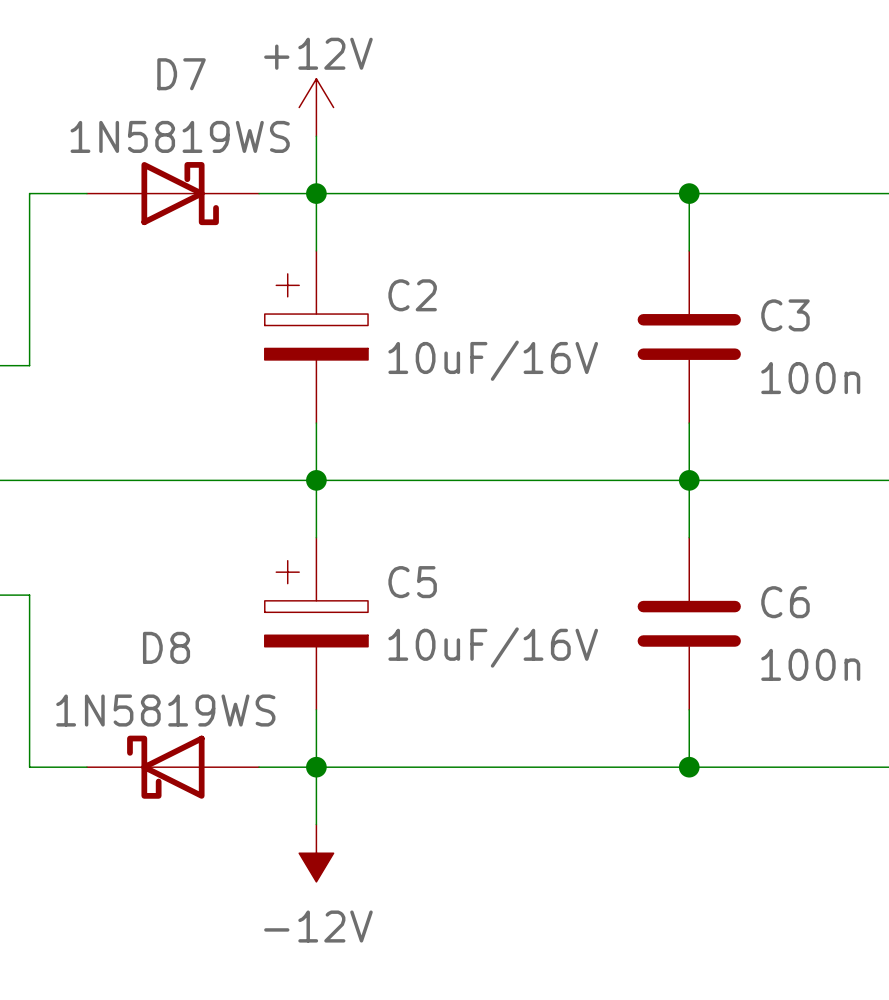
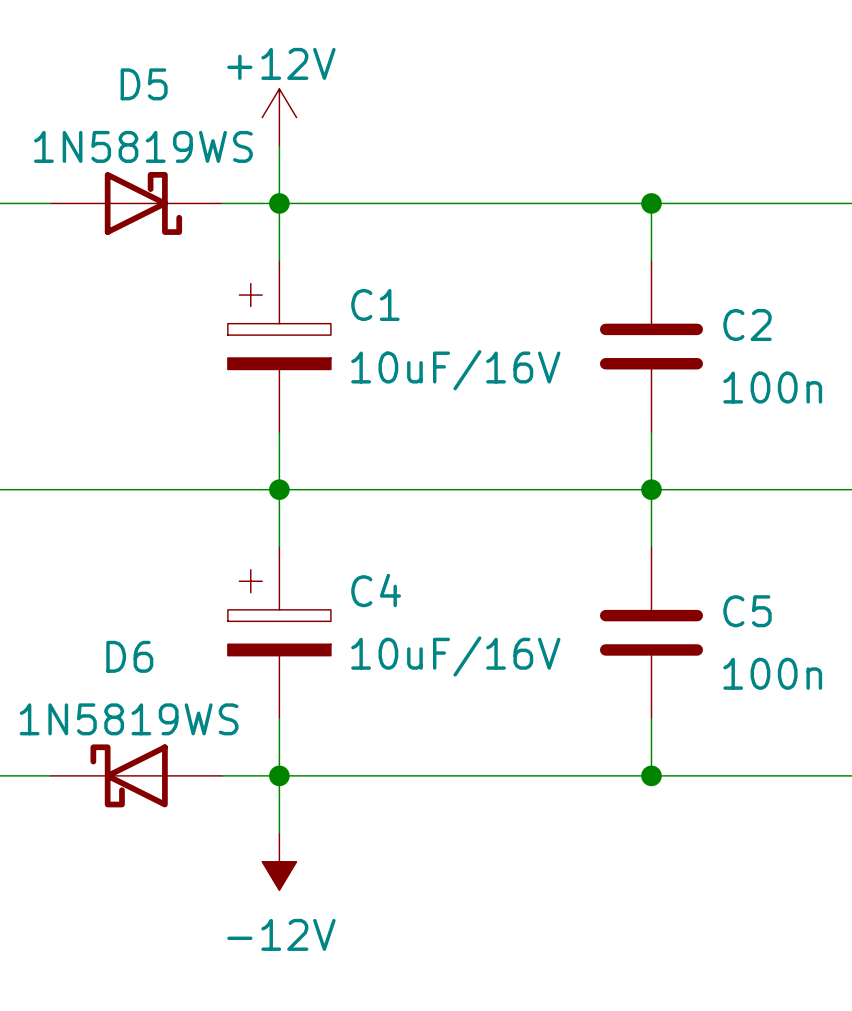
D7 name: D7 (181, 74) -> D5 (144, 84)
C2 name: C2 (412, 295) -> C1 (375, 304)
C3 name: C3 (785, 315) -> C2 (747, 325)
C5 name: C5 (412, 582) -> C4 (376, 590)
C6 name: C6 (785, 602) -> C5 (747, 611)
D8 name: D8 (166, 647) -> D6 (129, 656)

